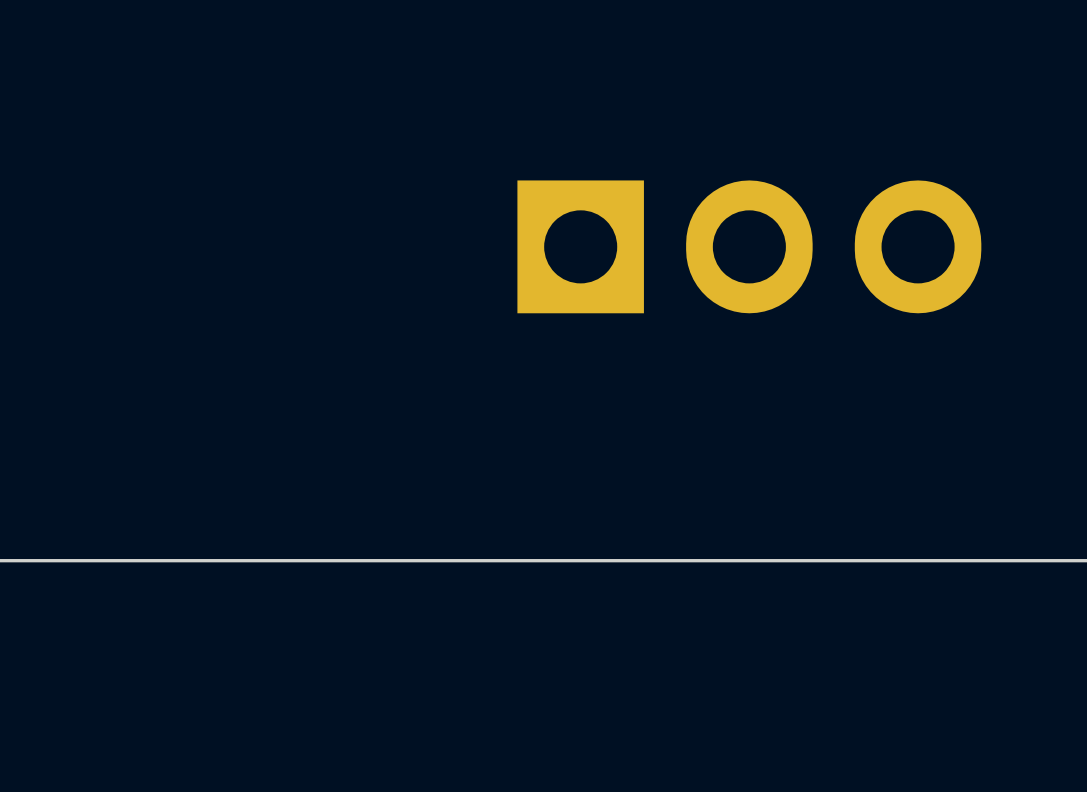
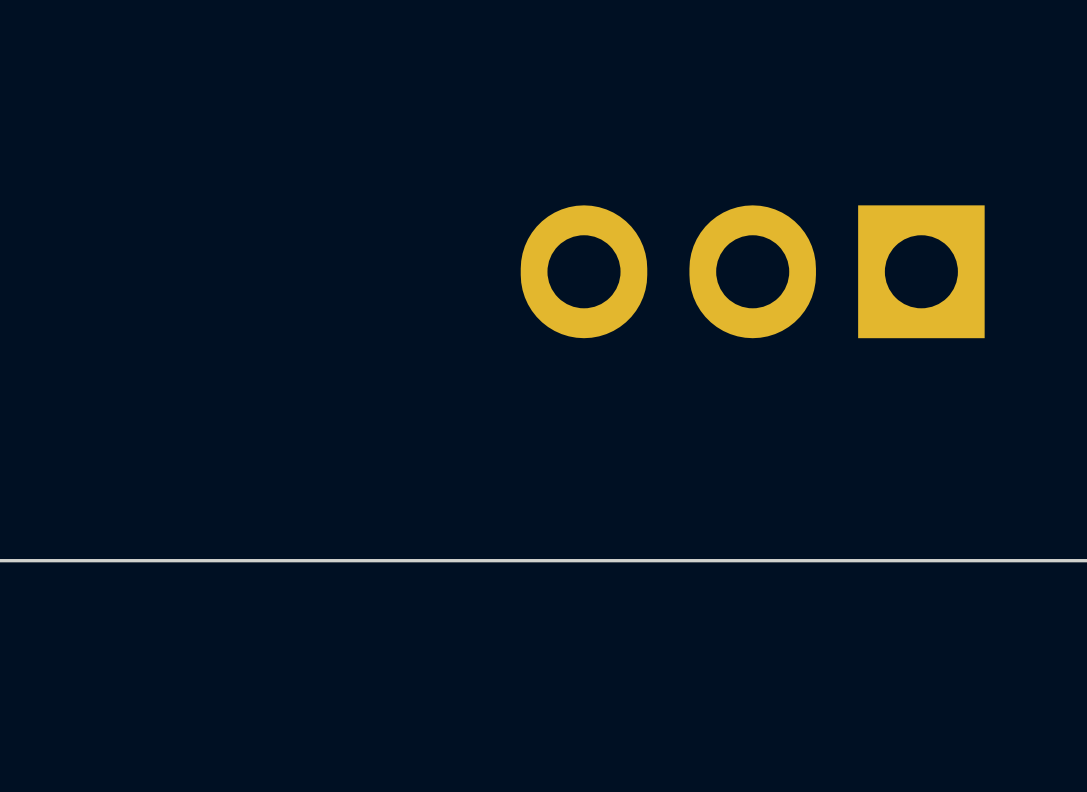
part rotation: 0° (749, 246) -> 180° (752, 271)

